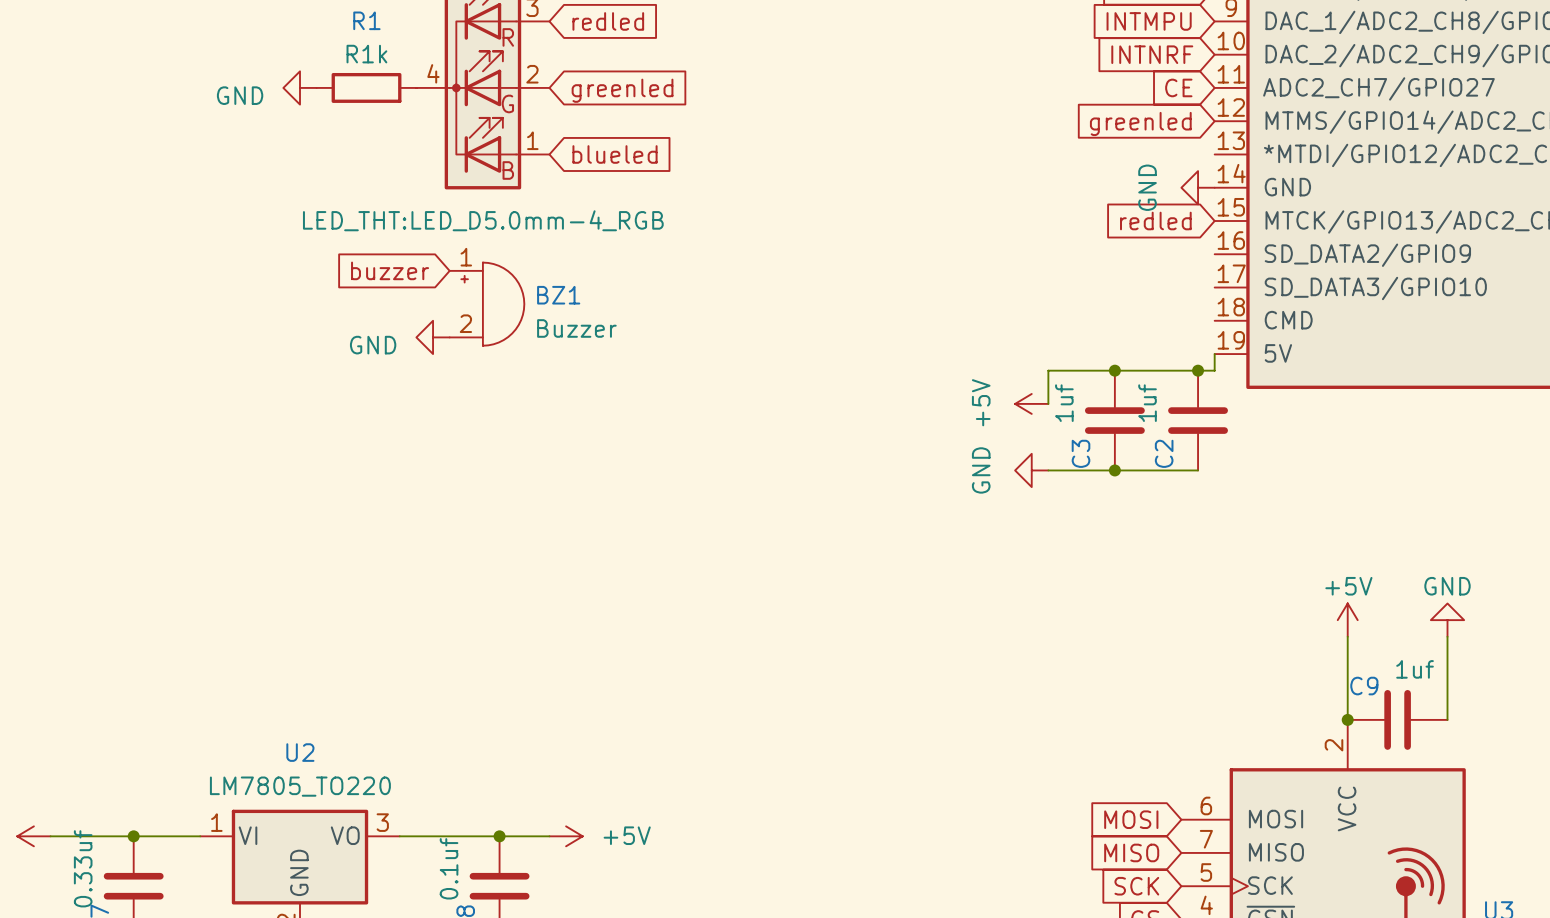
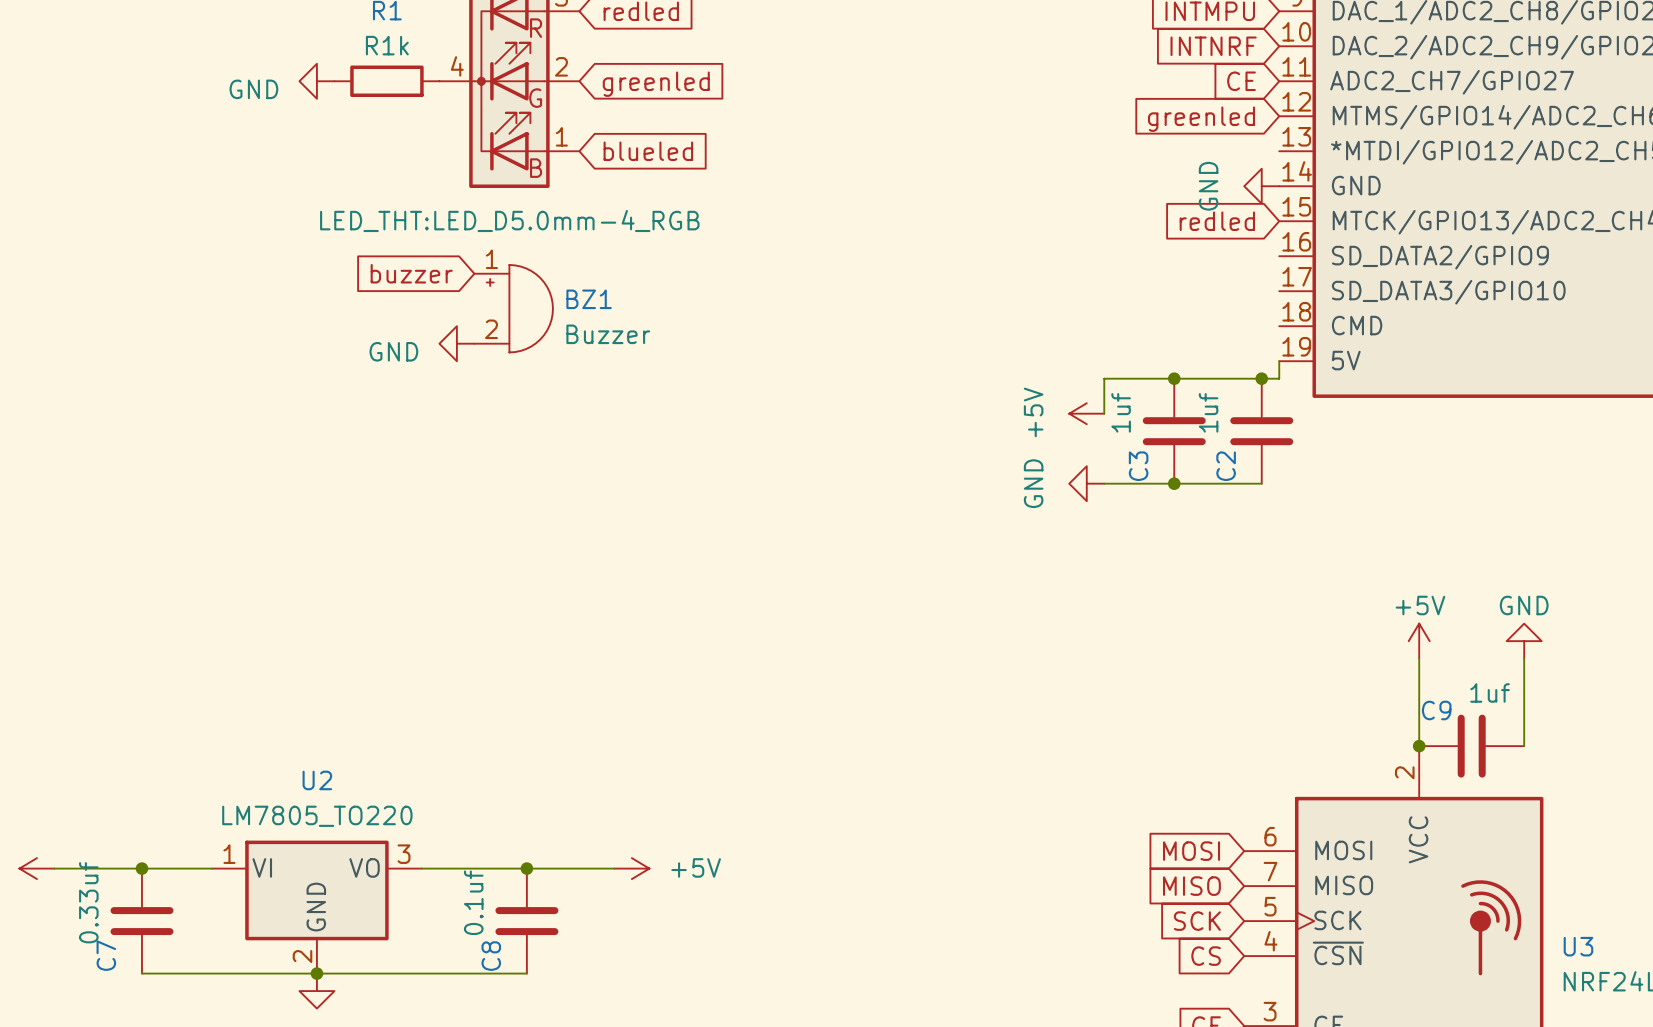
power symbol position: +5V (566, 836) -> +5V (631, 868)

